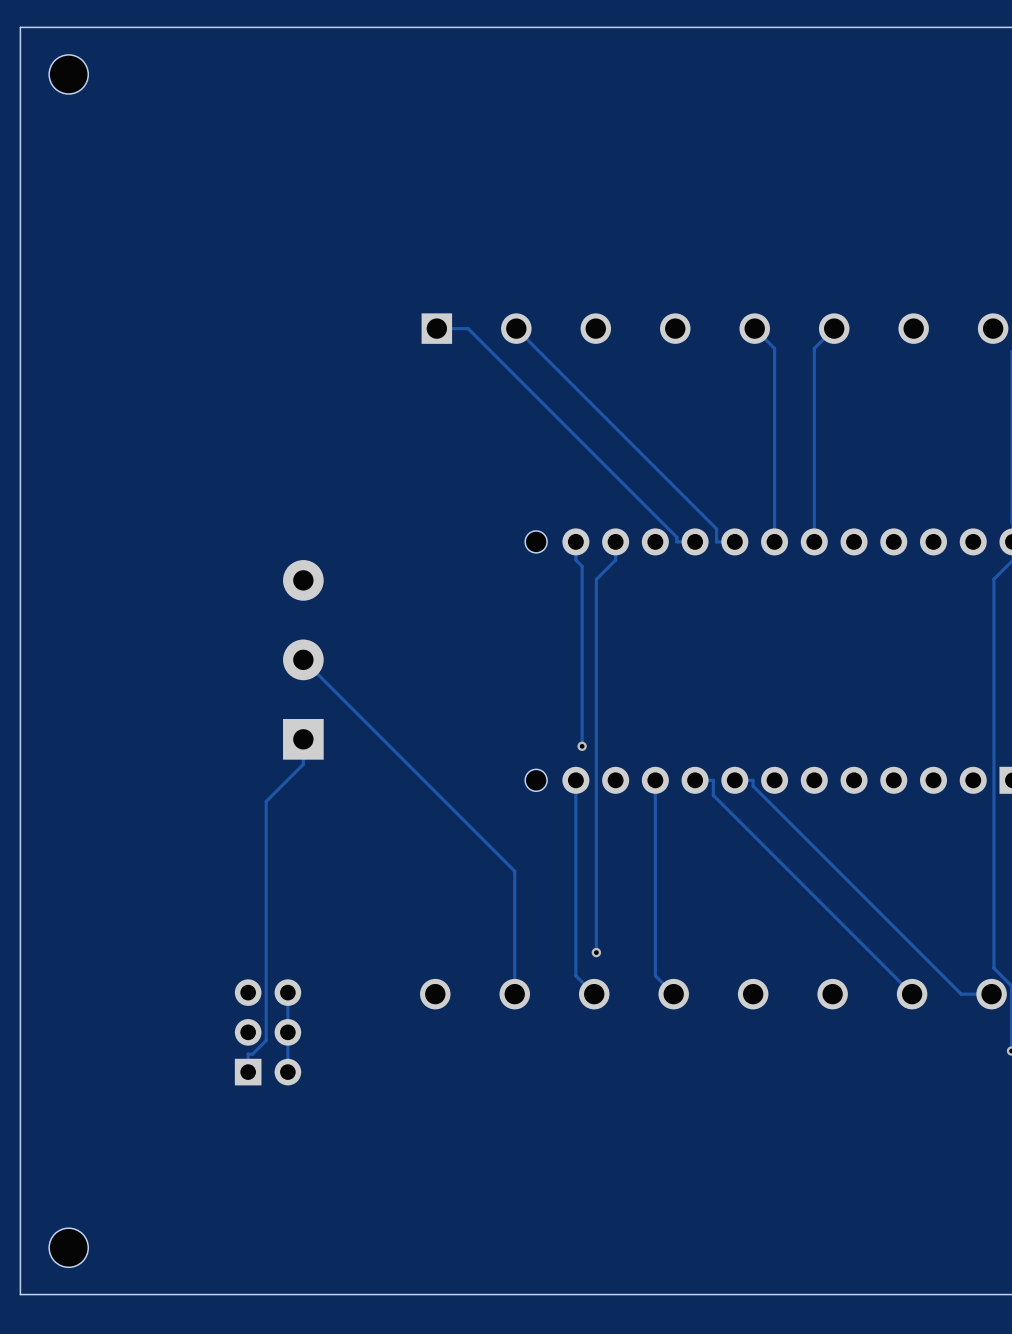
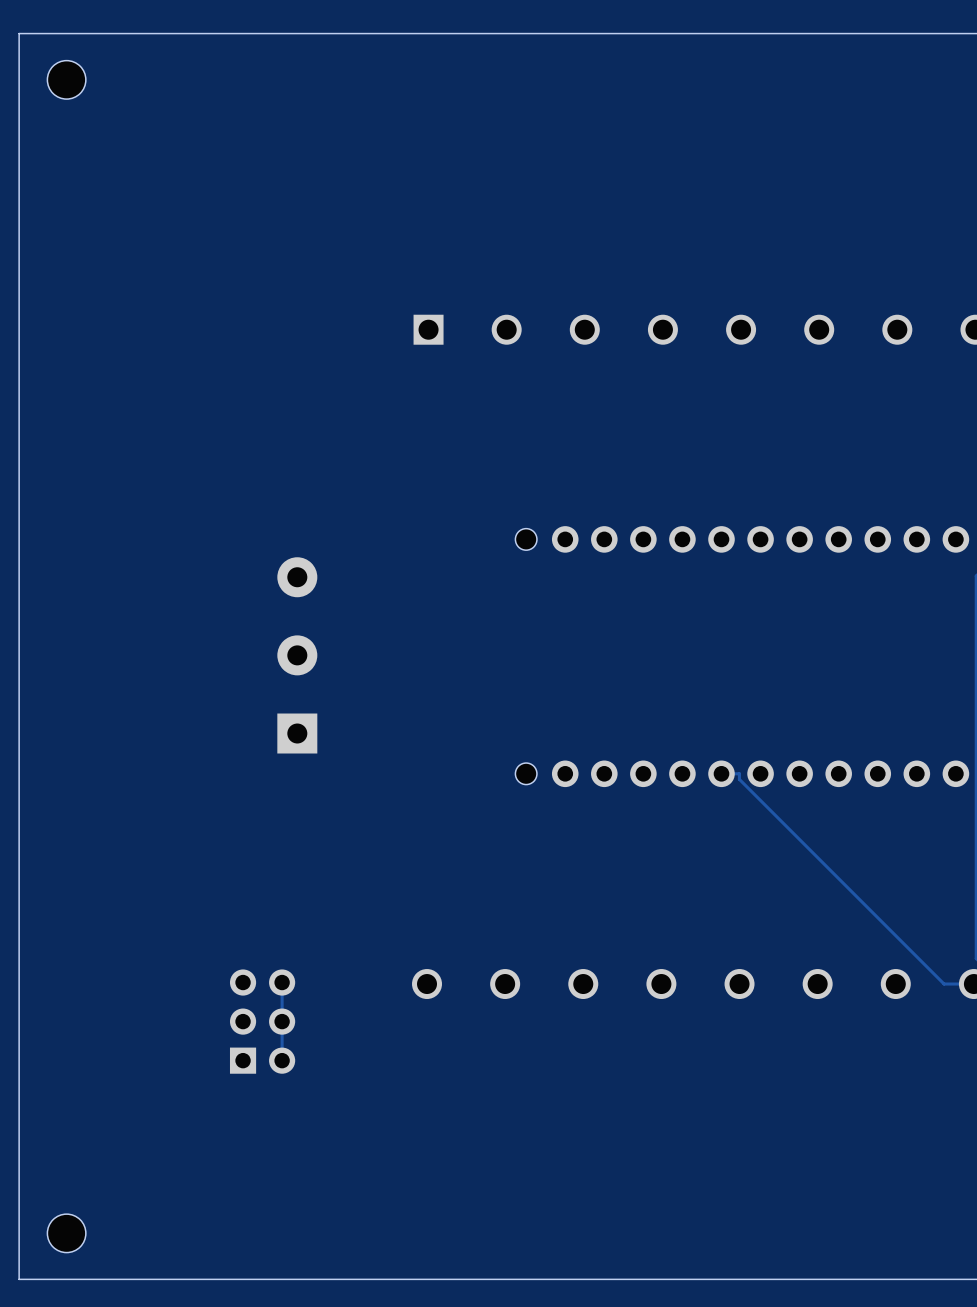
track: (436, 328) (468, 328) (676, 537) (676, 541) (695, 541) -> none
track: (516, 328) (716, 528) (716, 541) (734, 541) -> none
track: (754, 328) (774, 348) (774, 541) -> none
track: (834, 328) (814, 348) (814, 541) -> none
track: (575, 541) (575, 560) (582, 566) (582, 746) -> none
track: (615, 541) (615, 560) (596, 579) (596, 952) -> none
track: (303, 659) (514, 871) (514, 994) -> none
track: (303, 739) (303, 764) (266, 801) (266, 1040) (252, 1054) (248, 1054) (248, 1072) -> none
via: (582, 746) -> none
track: (575, 780) (575, 975) (594, 994) -> none
track: (655, 780) (655, 975) (673, 994) -> none
track: (695, 780) (713, 780) (713, 795) (912, 994) -> none
via: (596, 952) -> none

